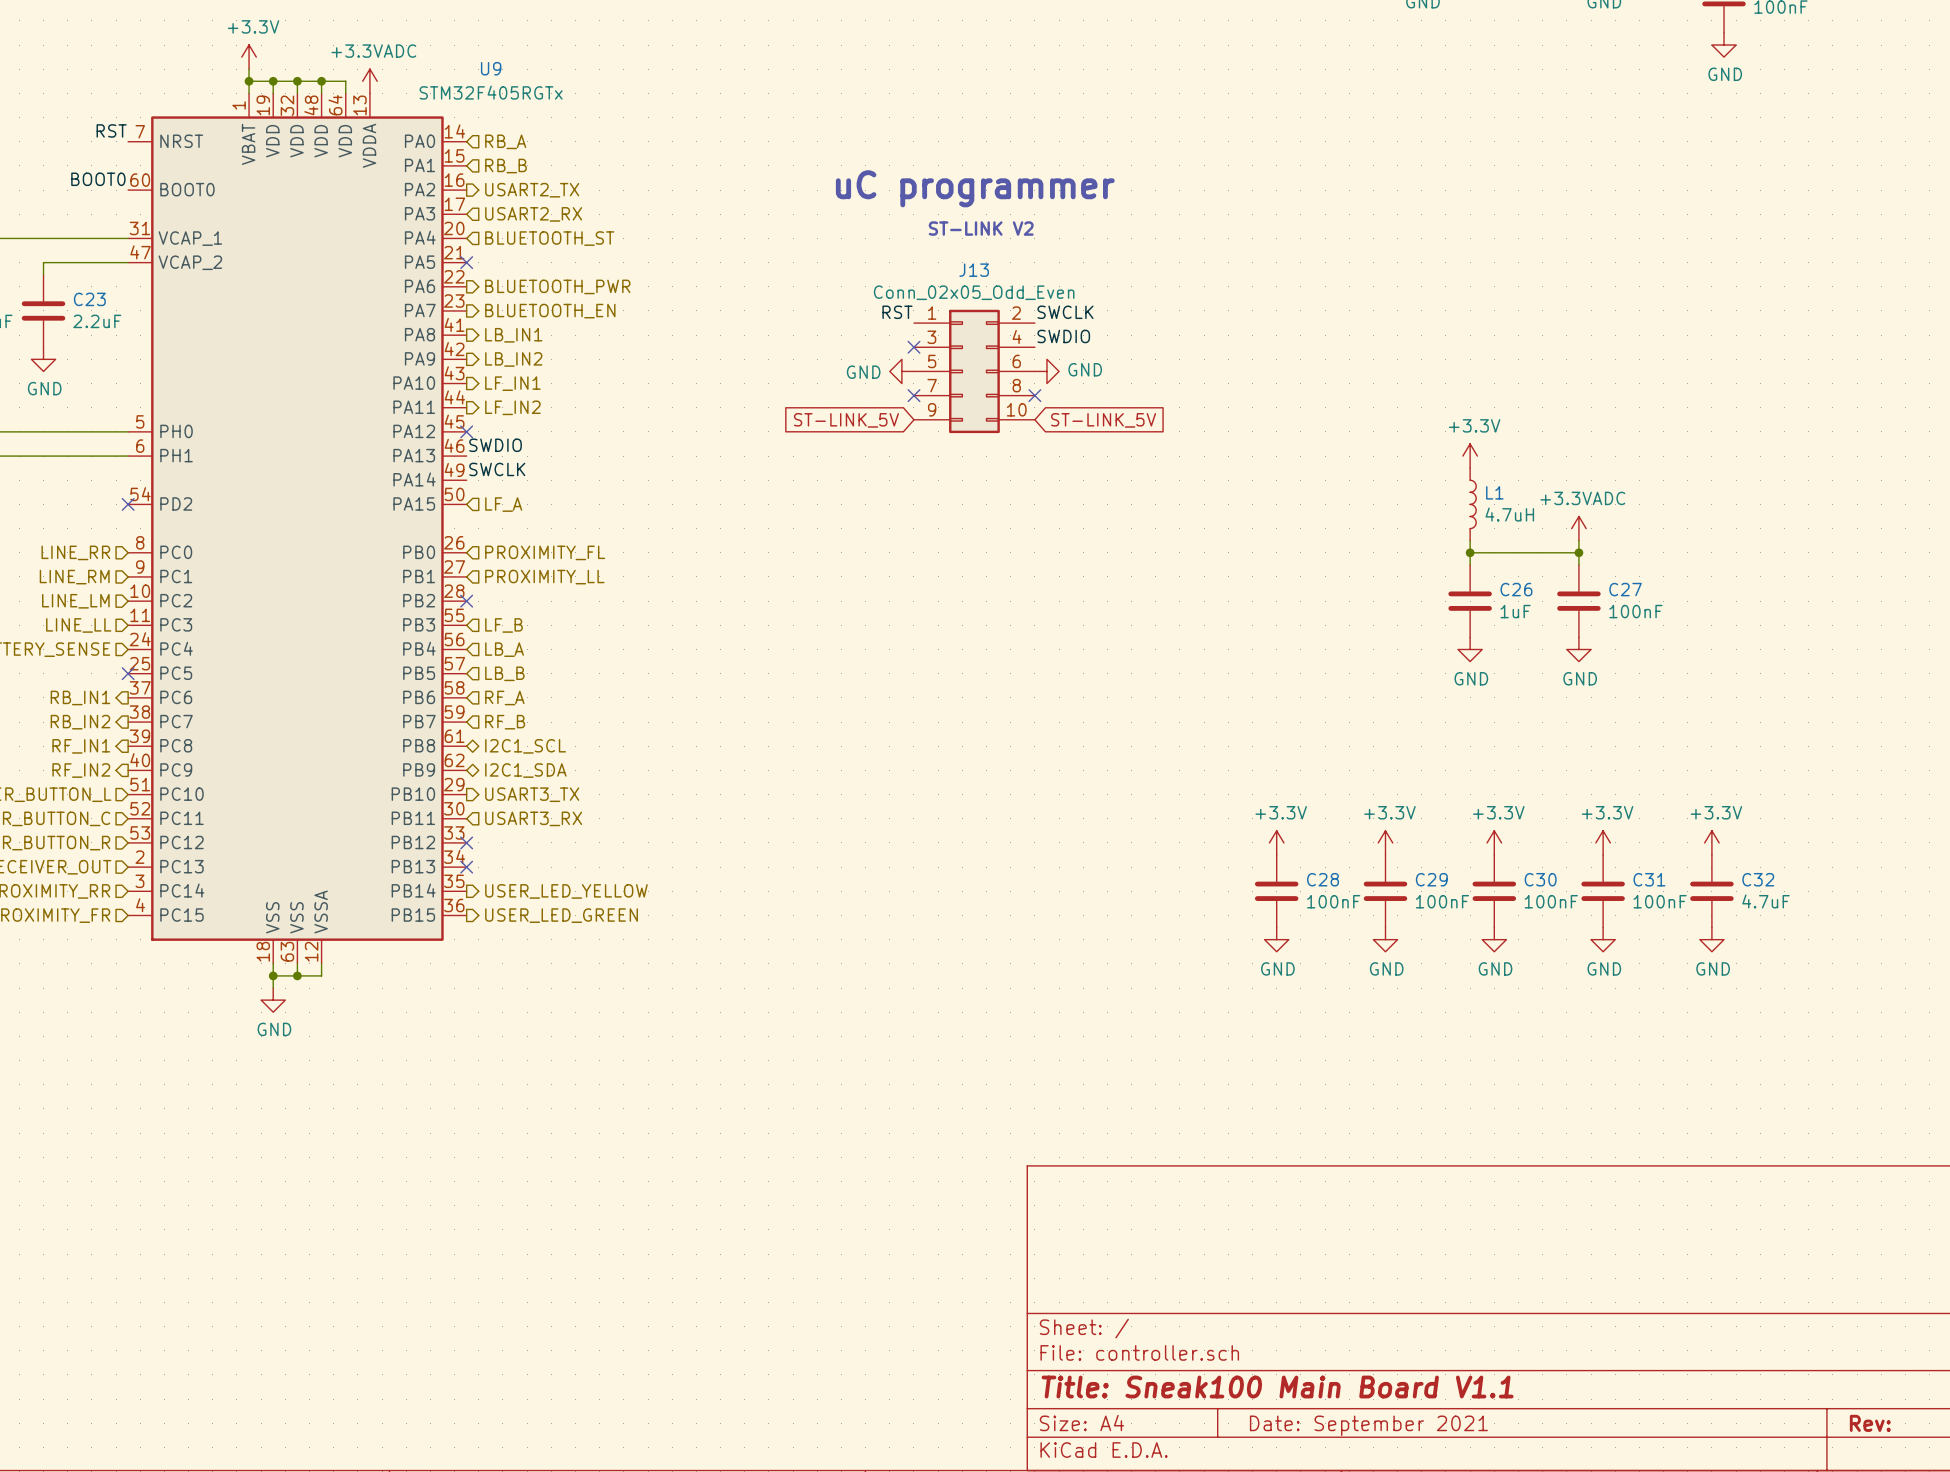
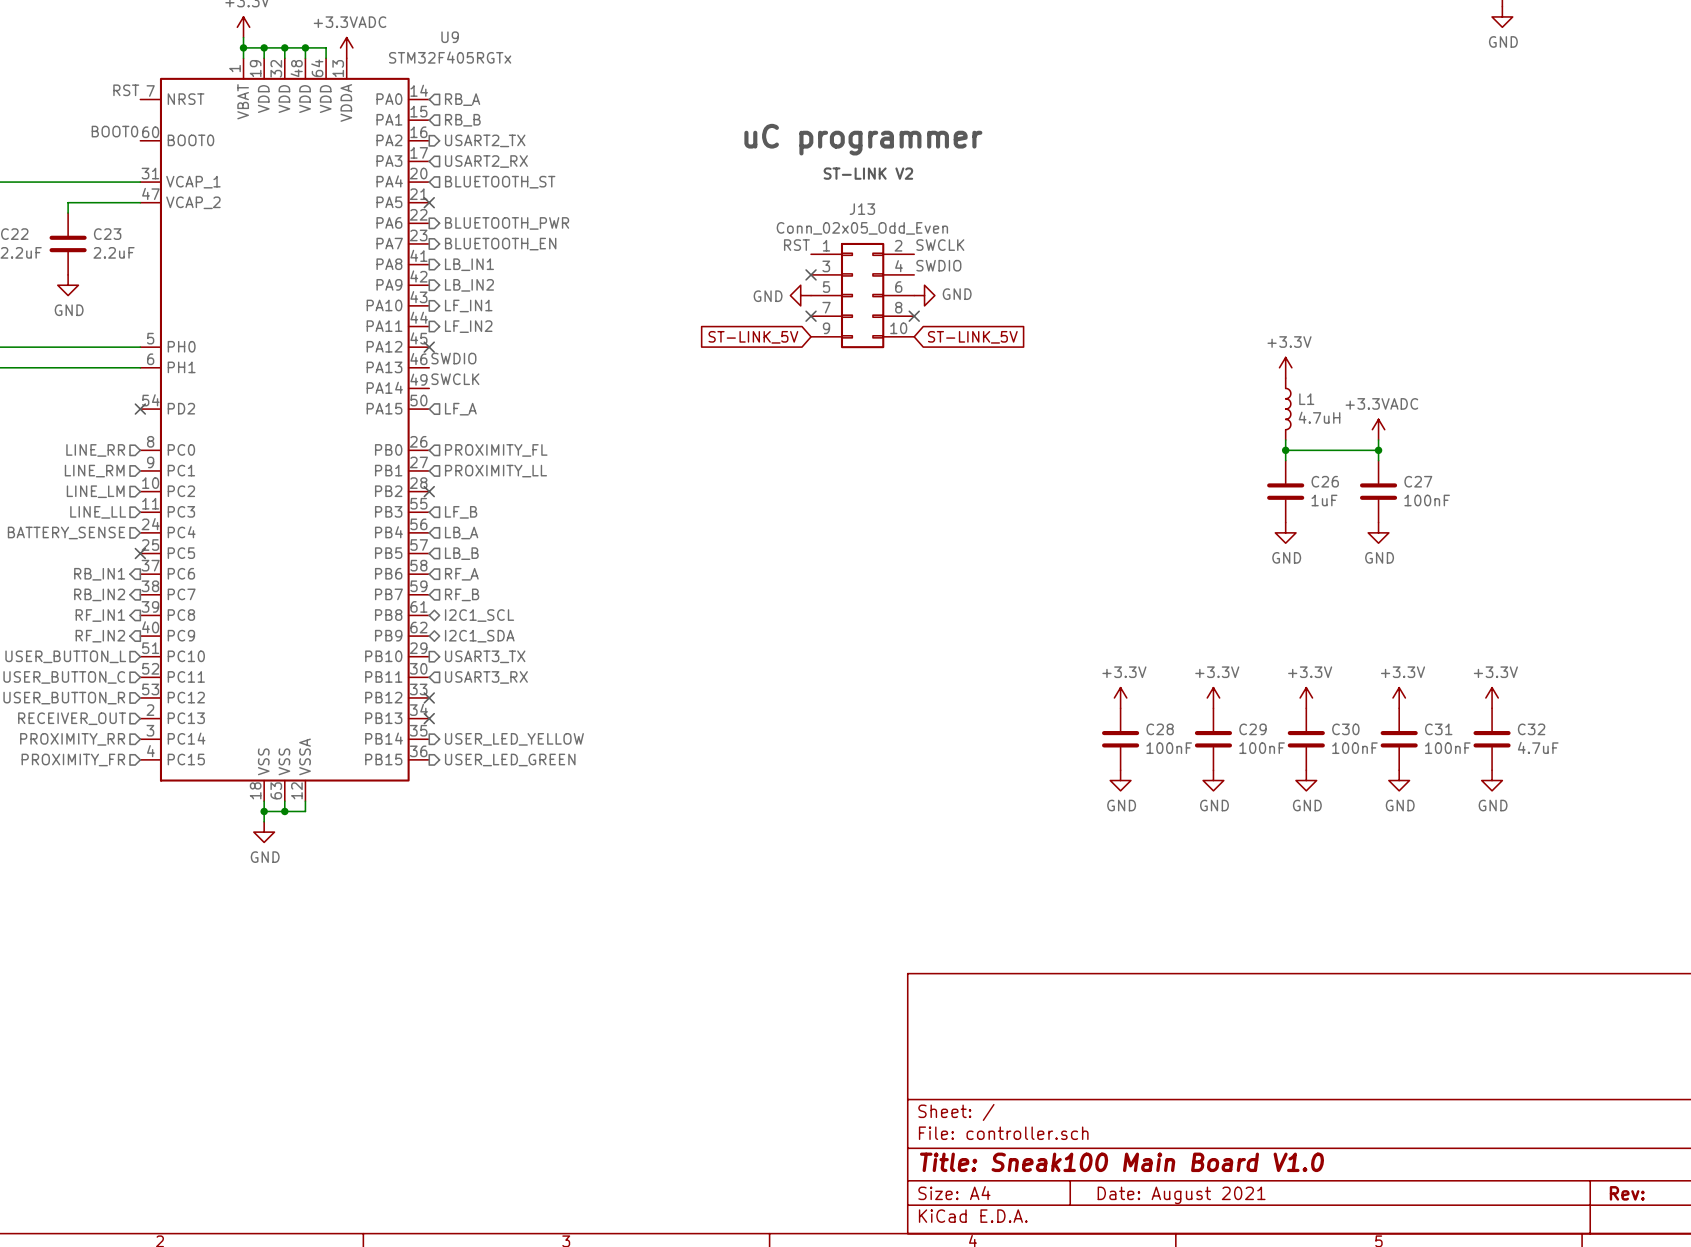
title block: Title: Sneak100 Main Board V1.1 (1277, 1387) -> Title: Sneak100 Main Board V1.0 (1121, 1162)
title block: Date: September 2021 (1368, 1425) -> Date: August 2021 (1181, 1195)

